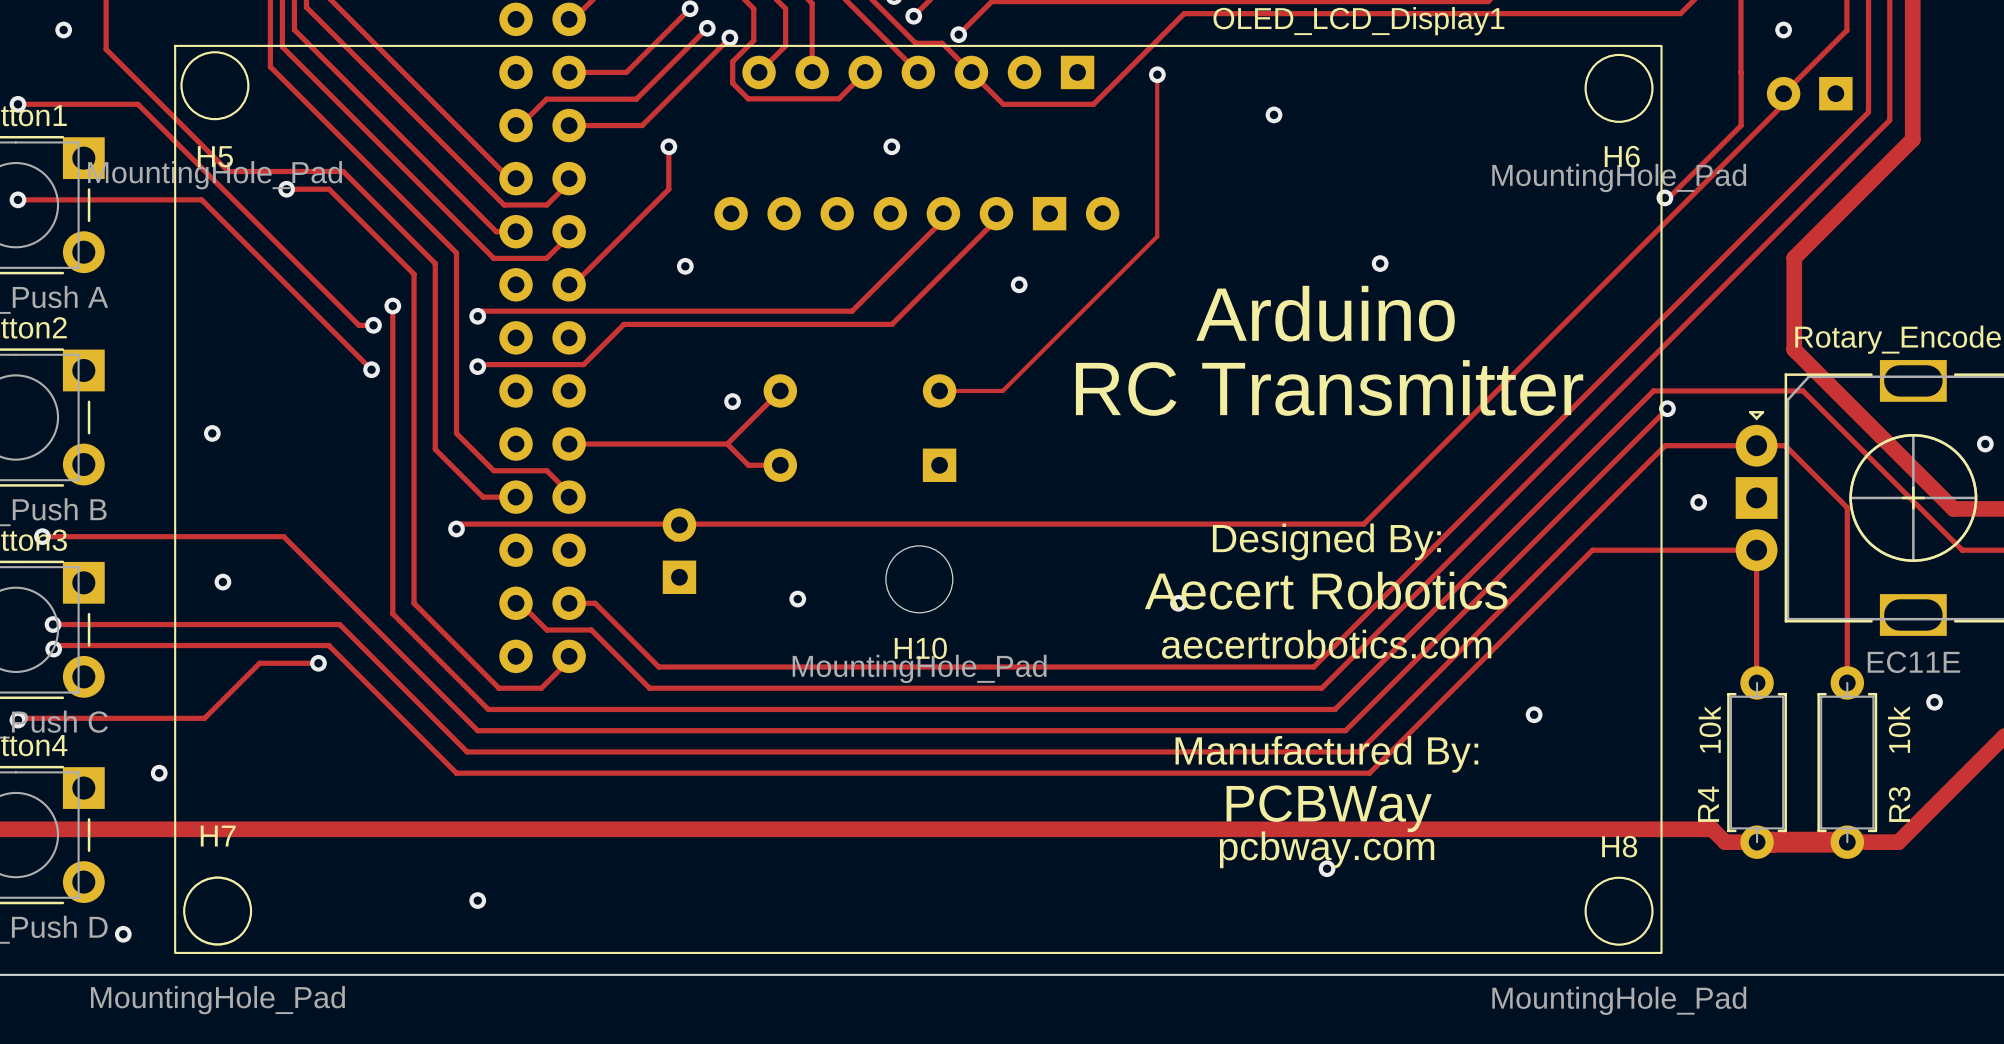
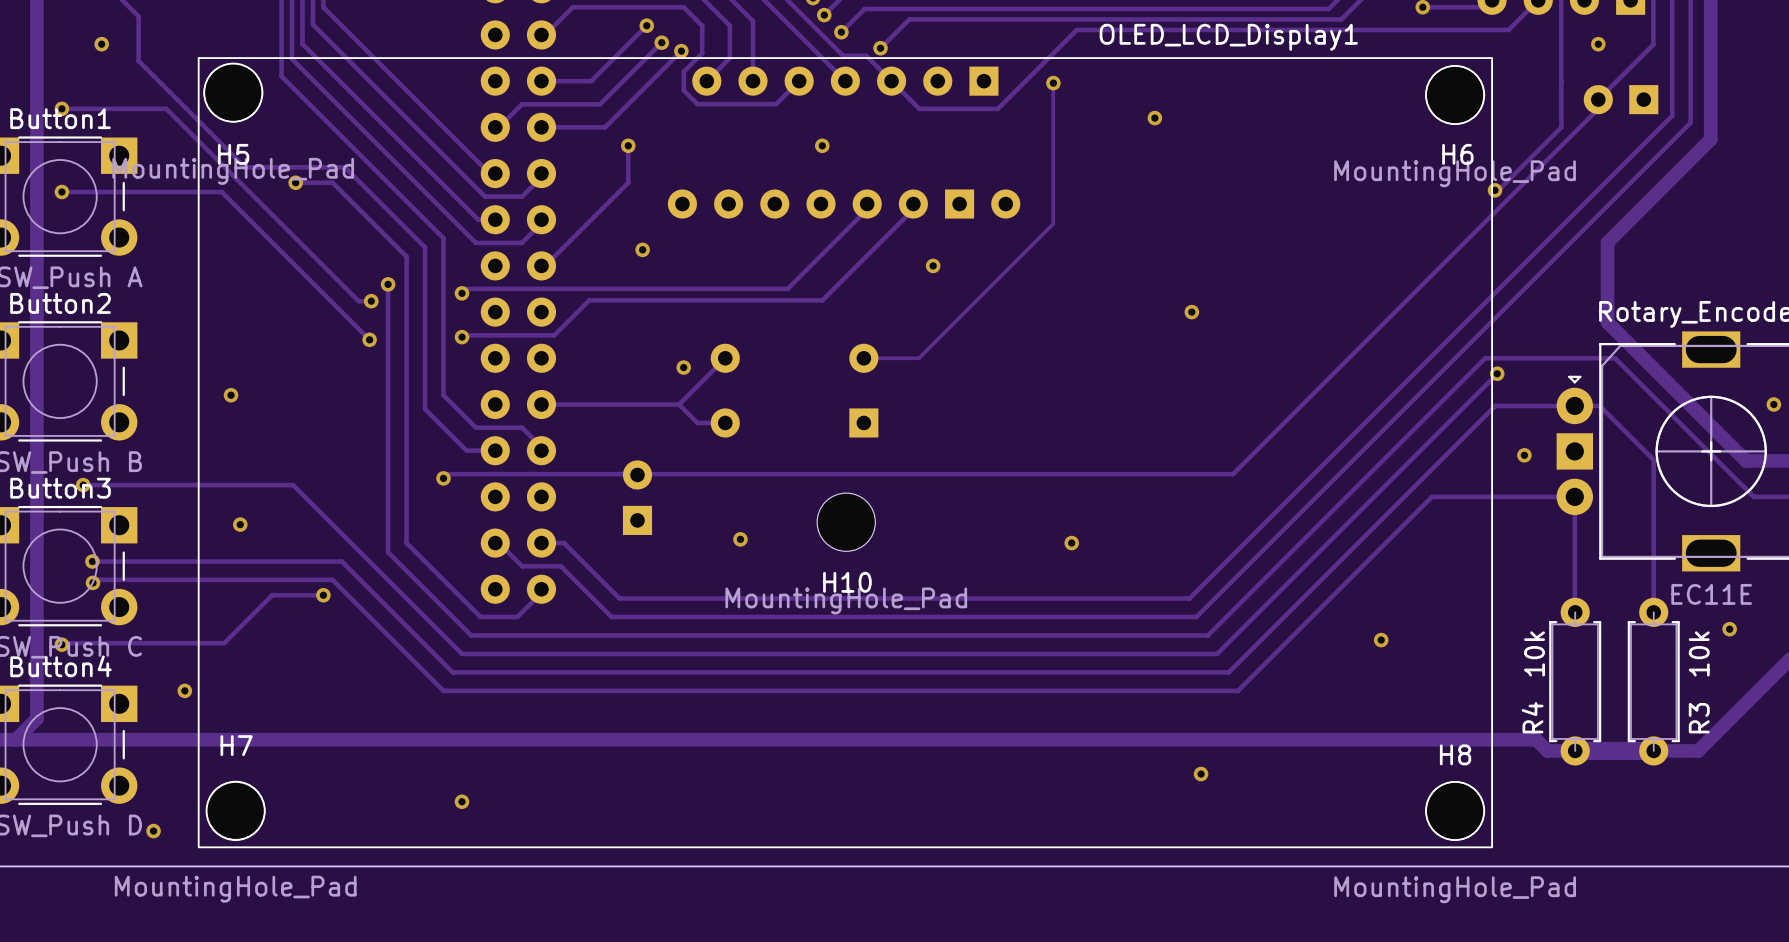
via position: (1380, 263) -> (1191, 312)
text: Arduino (1325, 313) -> none
text: RC Transmitter (1329, 387) -> none
text: Designed By: (1326, 541) -> none
text: Aecert Robotics (1326, 590) -> none
text: aecertrobotics.com (1326, 644) -> none
text: Manufactured By: (1326, 754) -> none
text: PCBWay (1329, 808) -> none
text: pcbway.com (1327, 849) -> none

